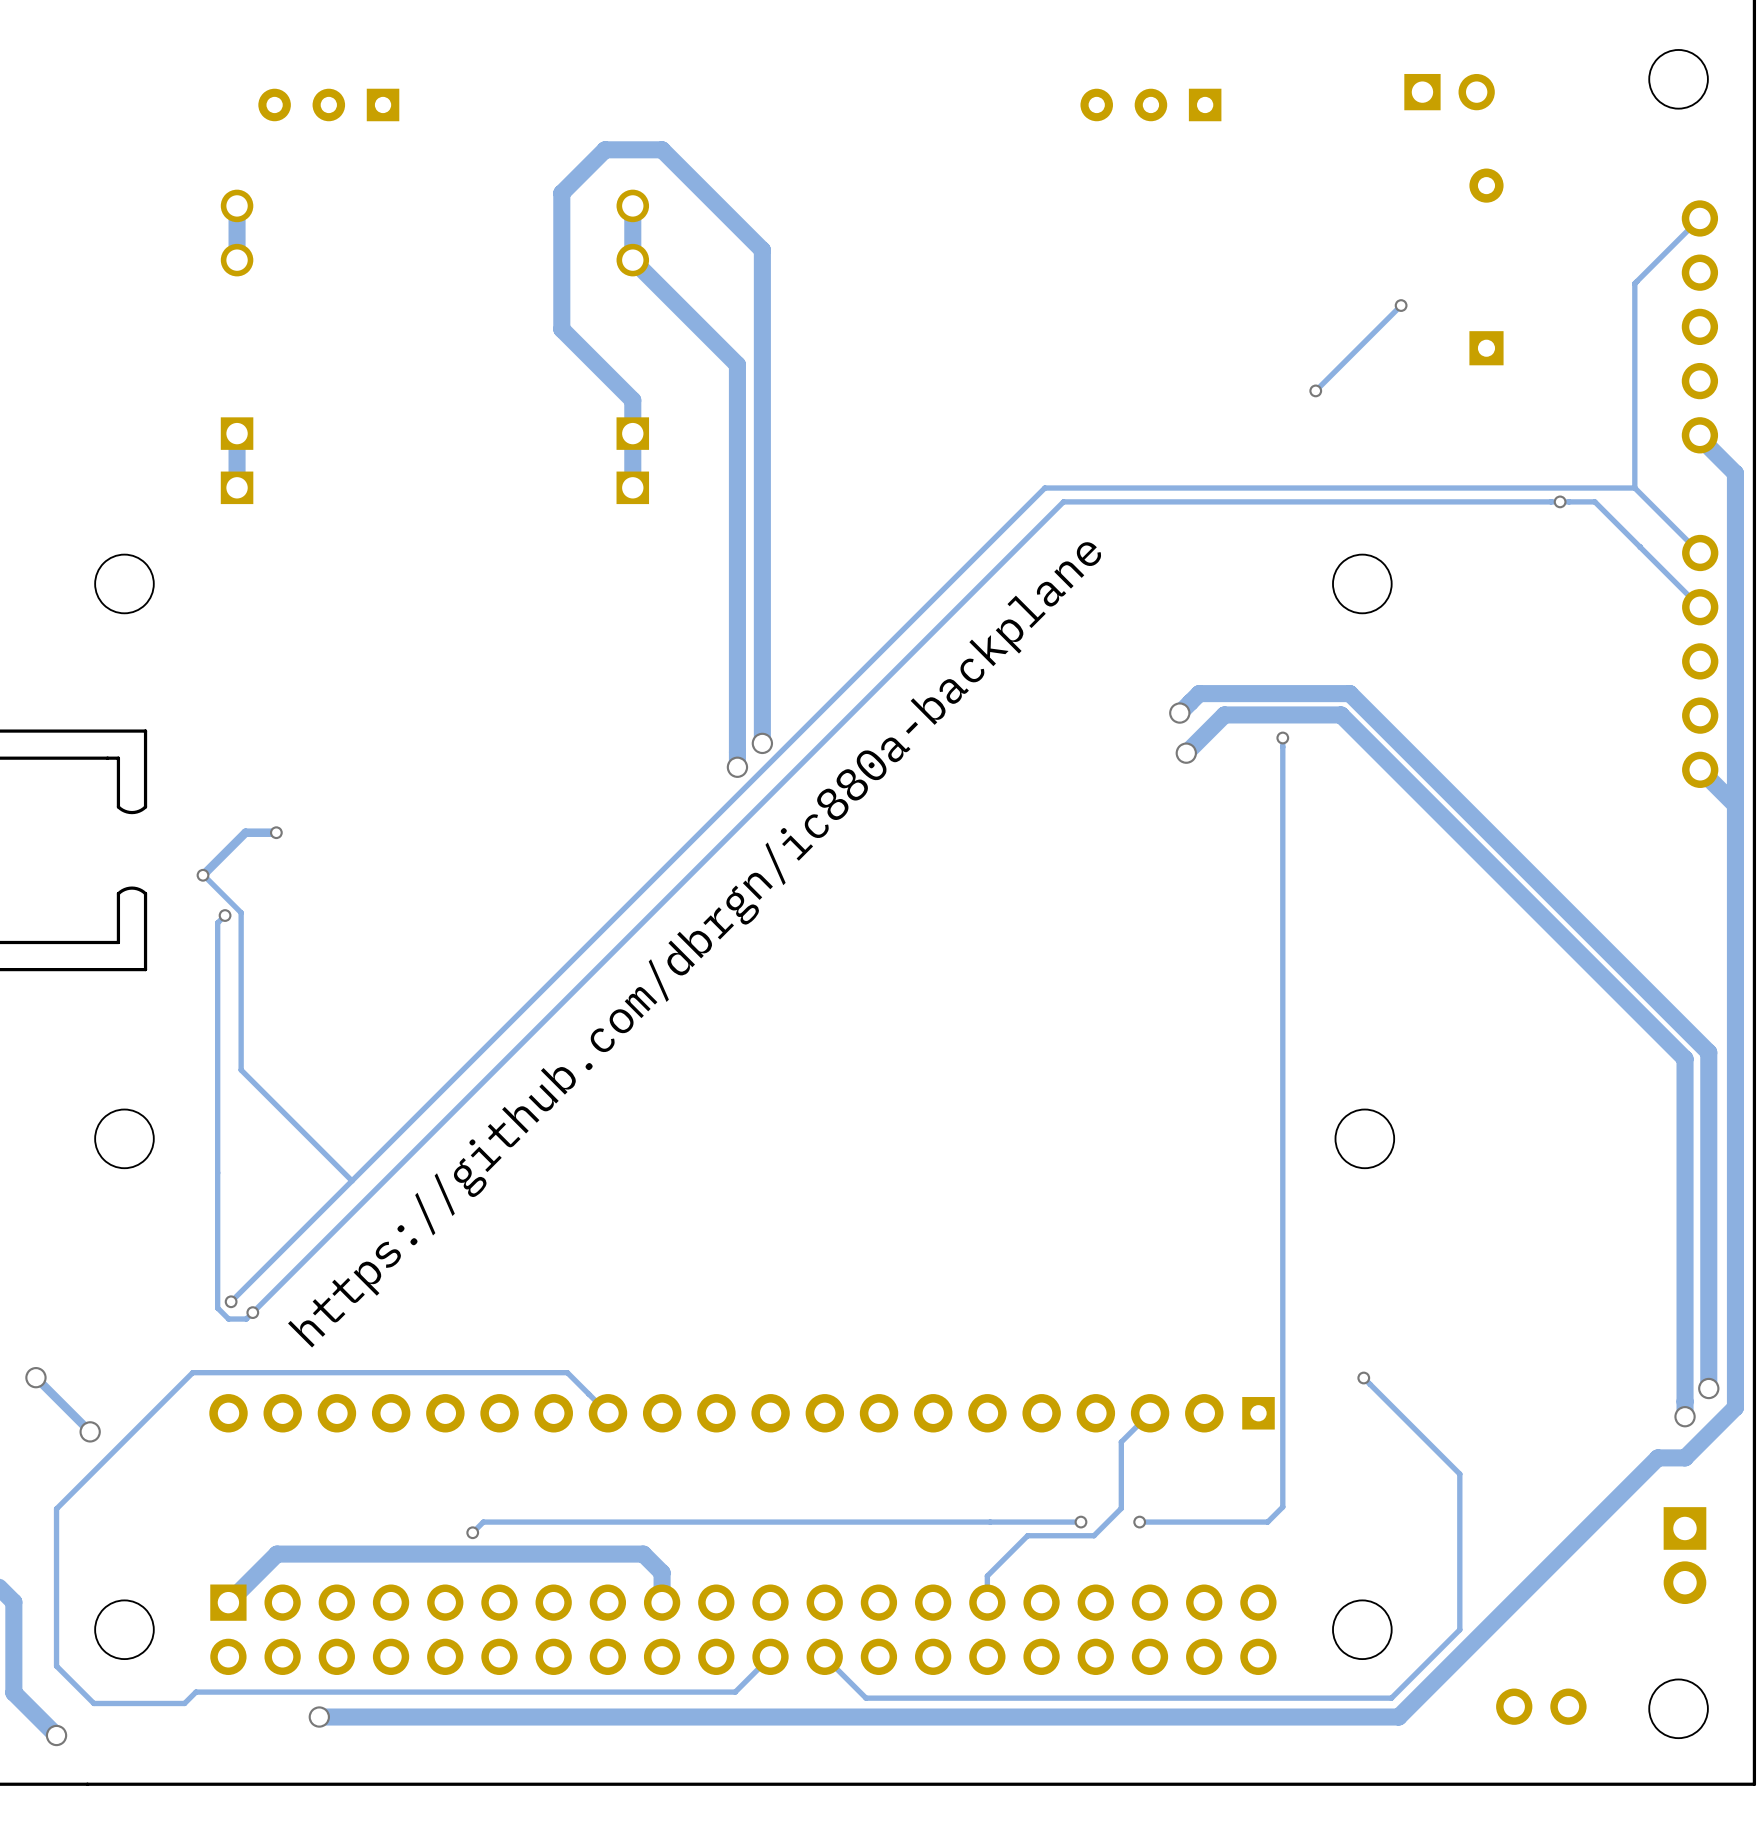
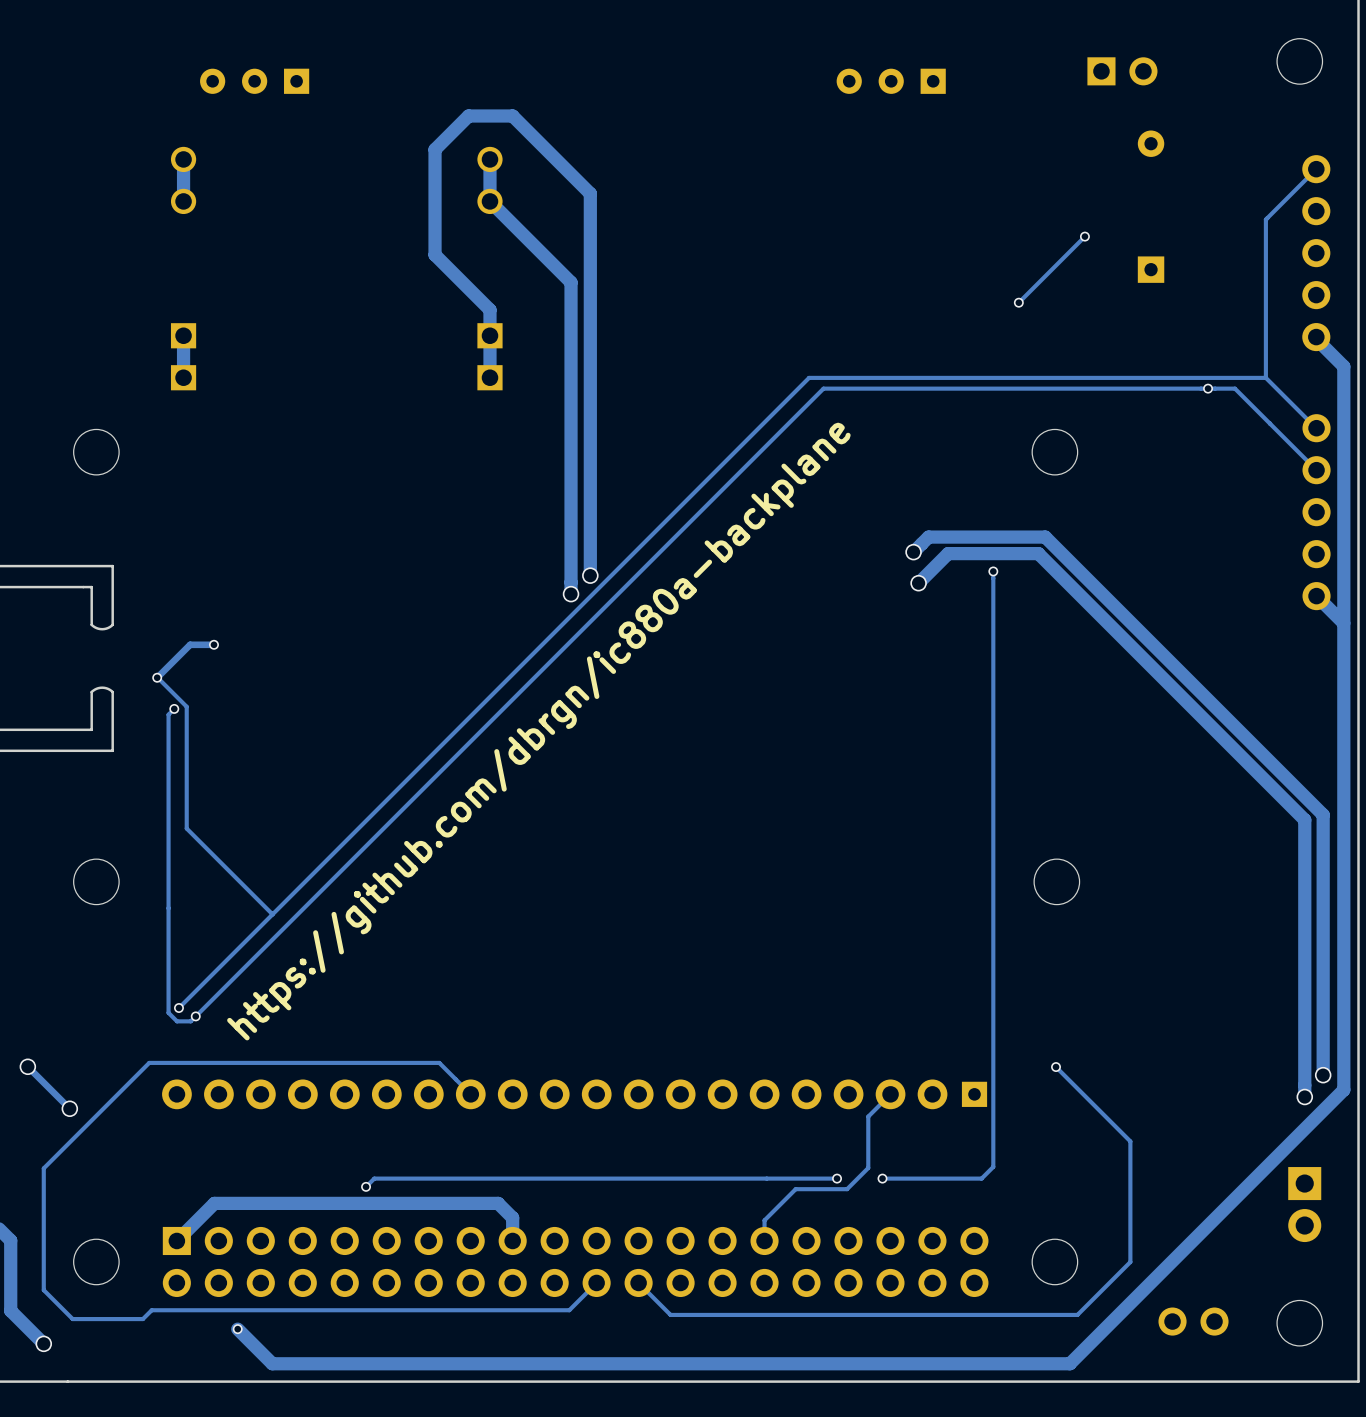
track: (1685, 1457) (1657, 1457) (1398, 1717) (319, 1717) -> (1304, 1128) (1069, 1363) (272, 1363) (237, 1329)
via size: [308, 1706, 330, 1728] -> [232, 1324, 243, 1335]

